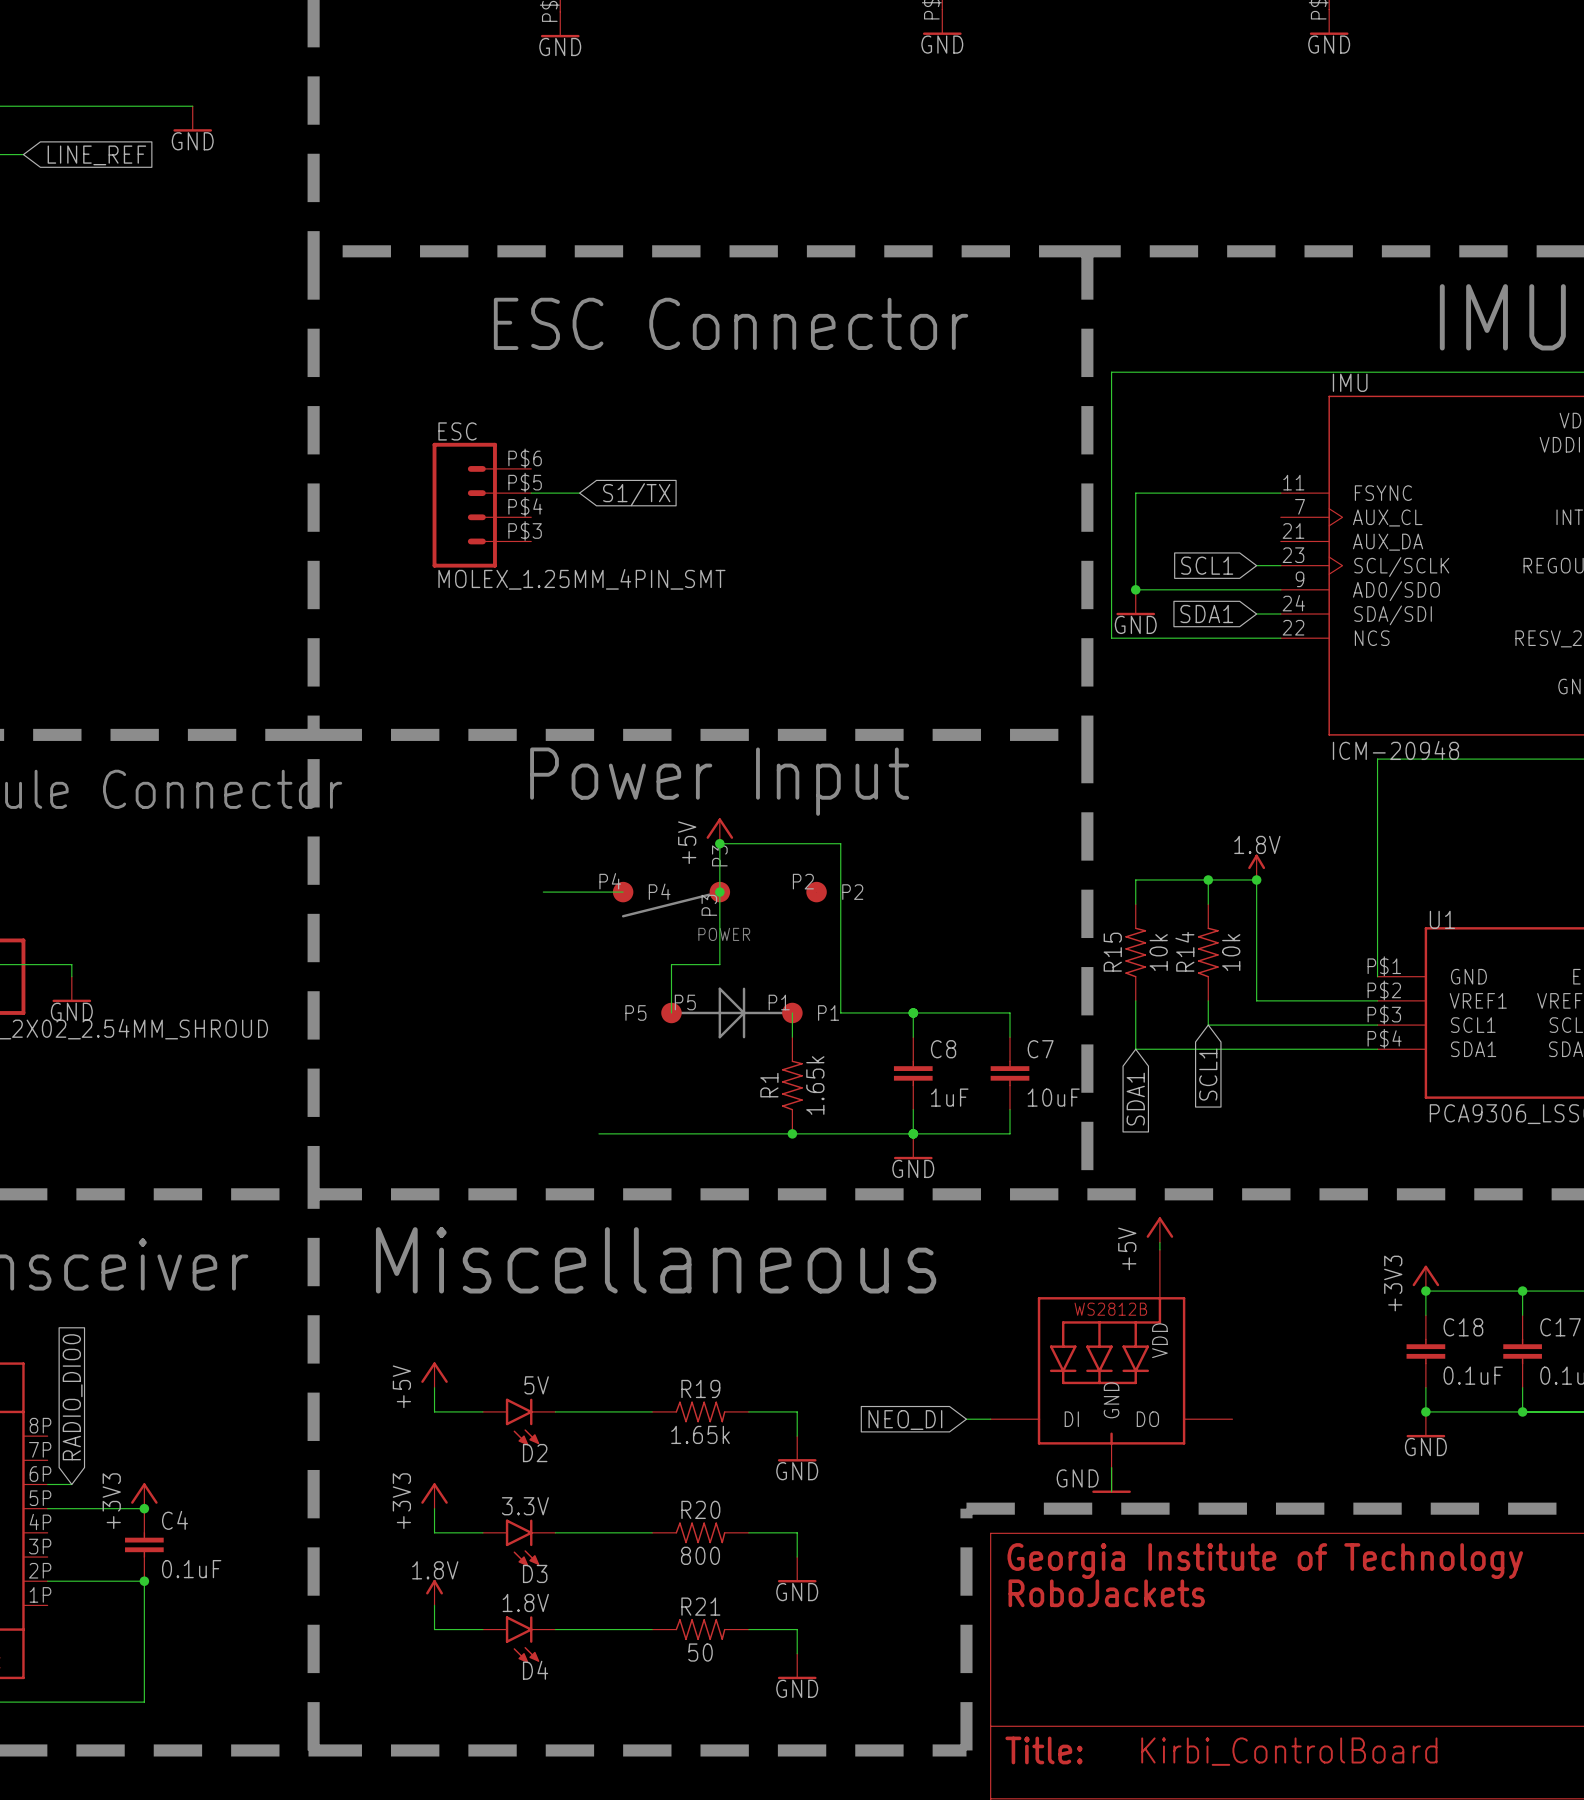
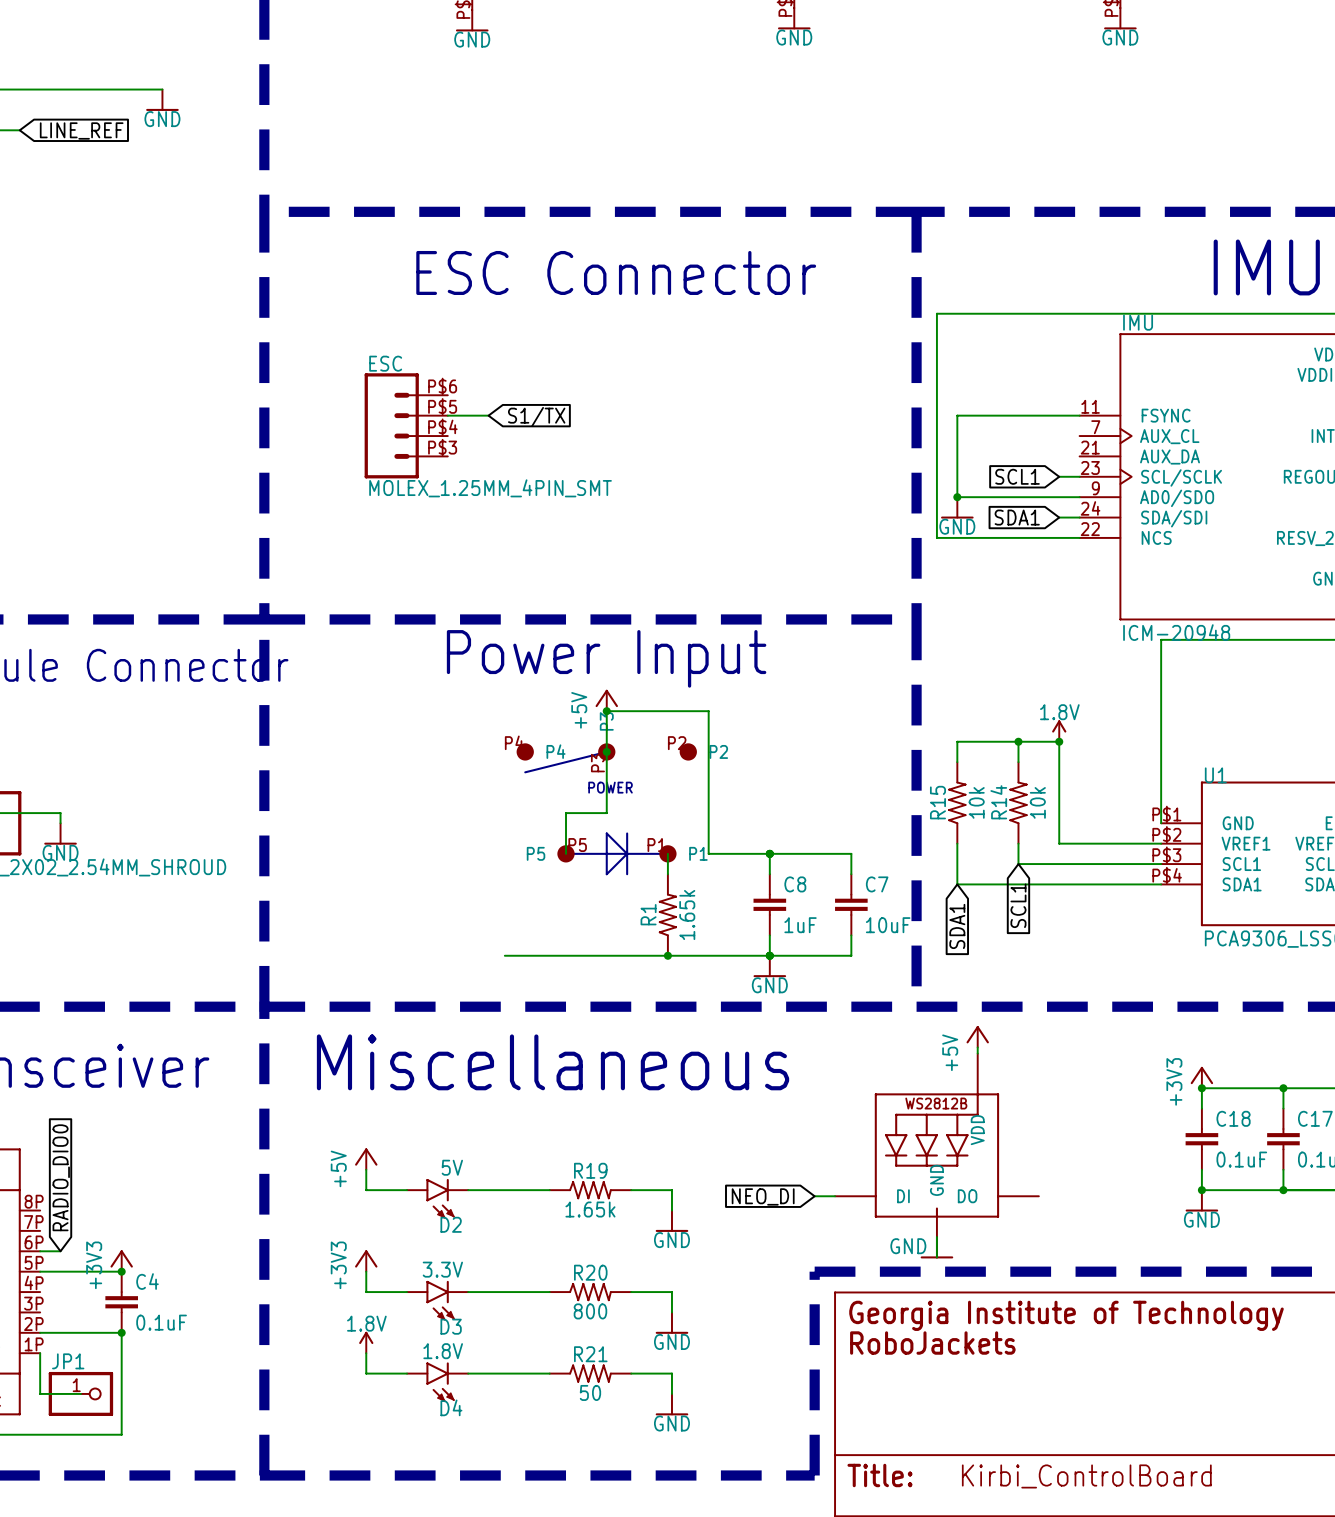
wire: (543, 892) (623, 892) -> none
wire: none -> (40, 1353) (40, 1393) (80, 1393)
JP1: none -> (80, 1393)

